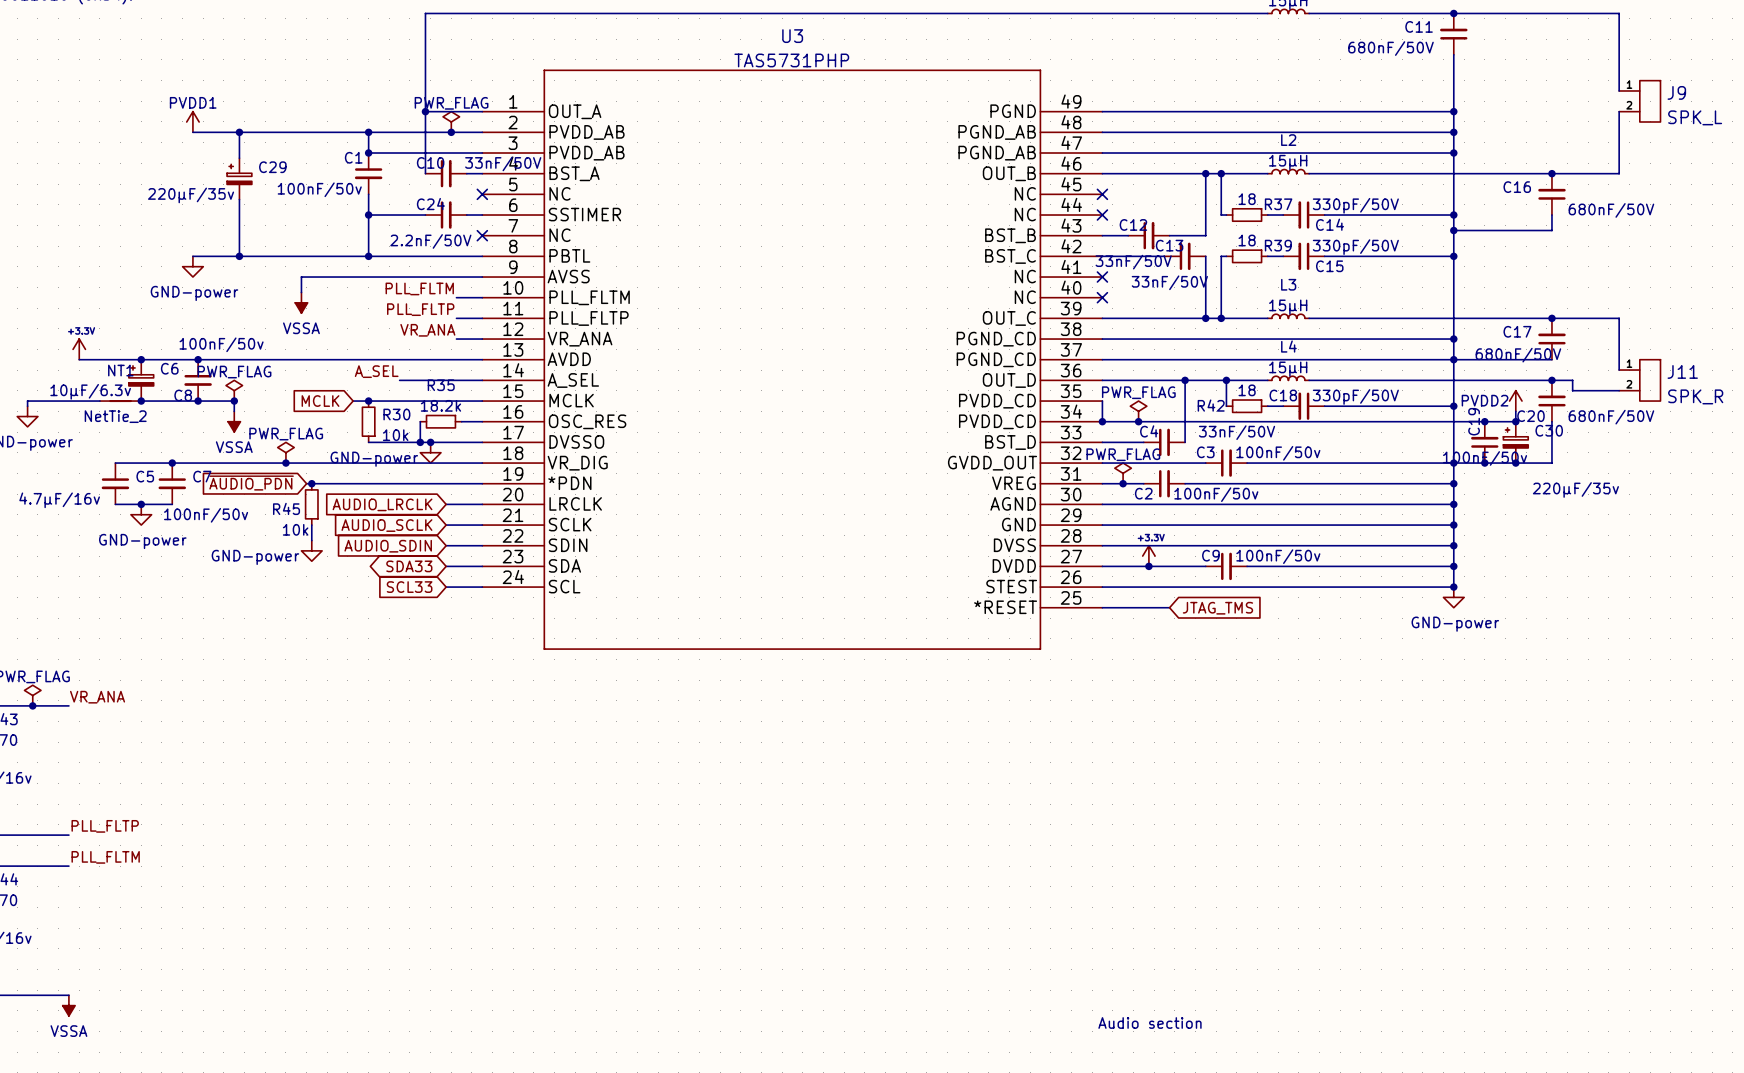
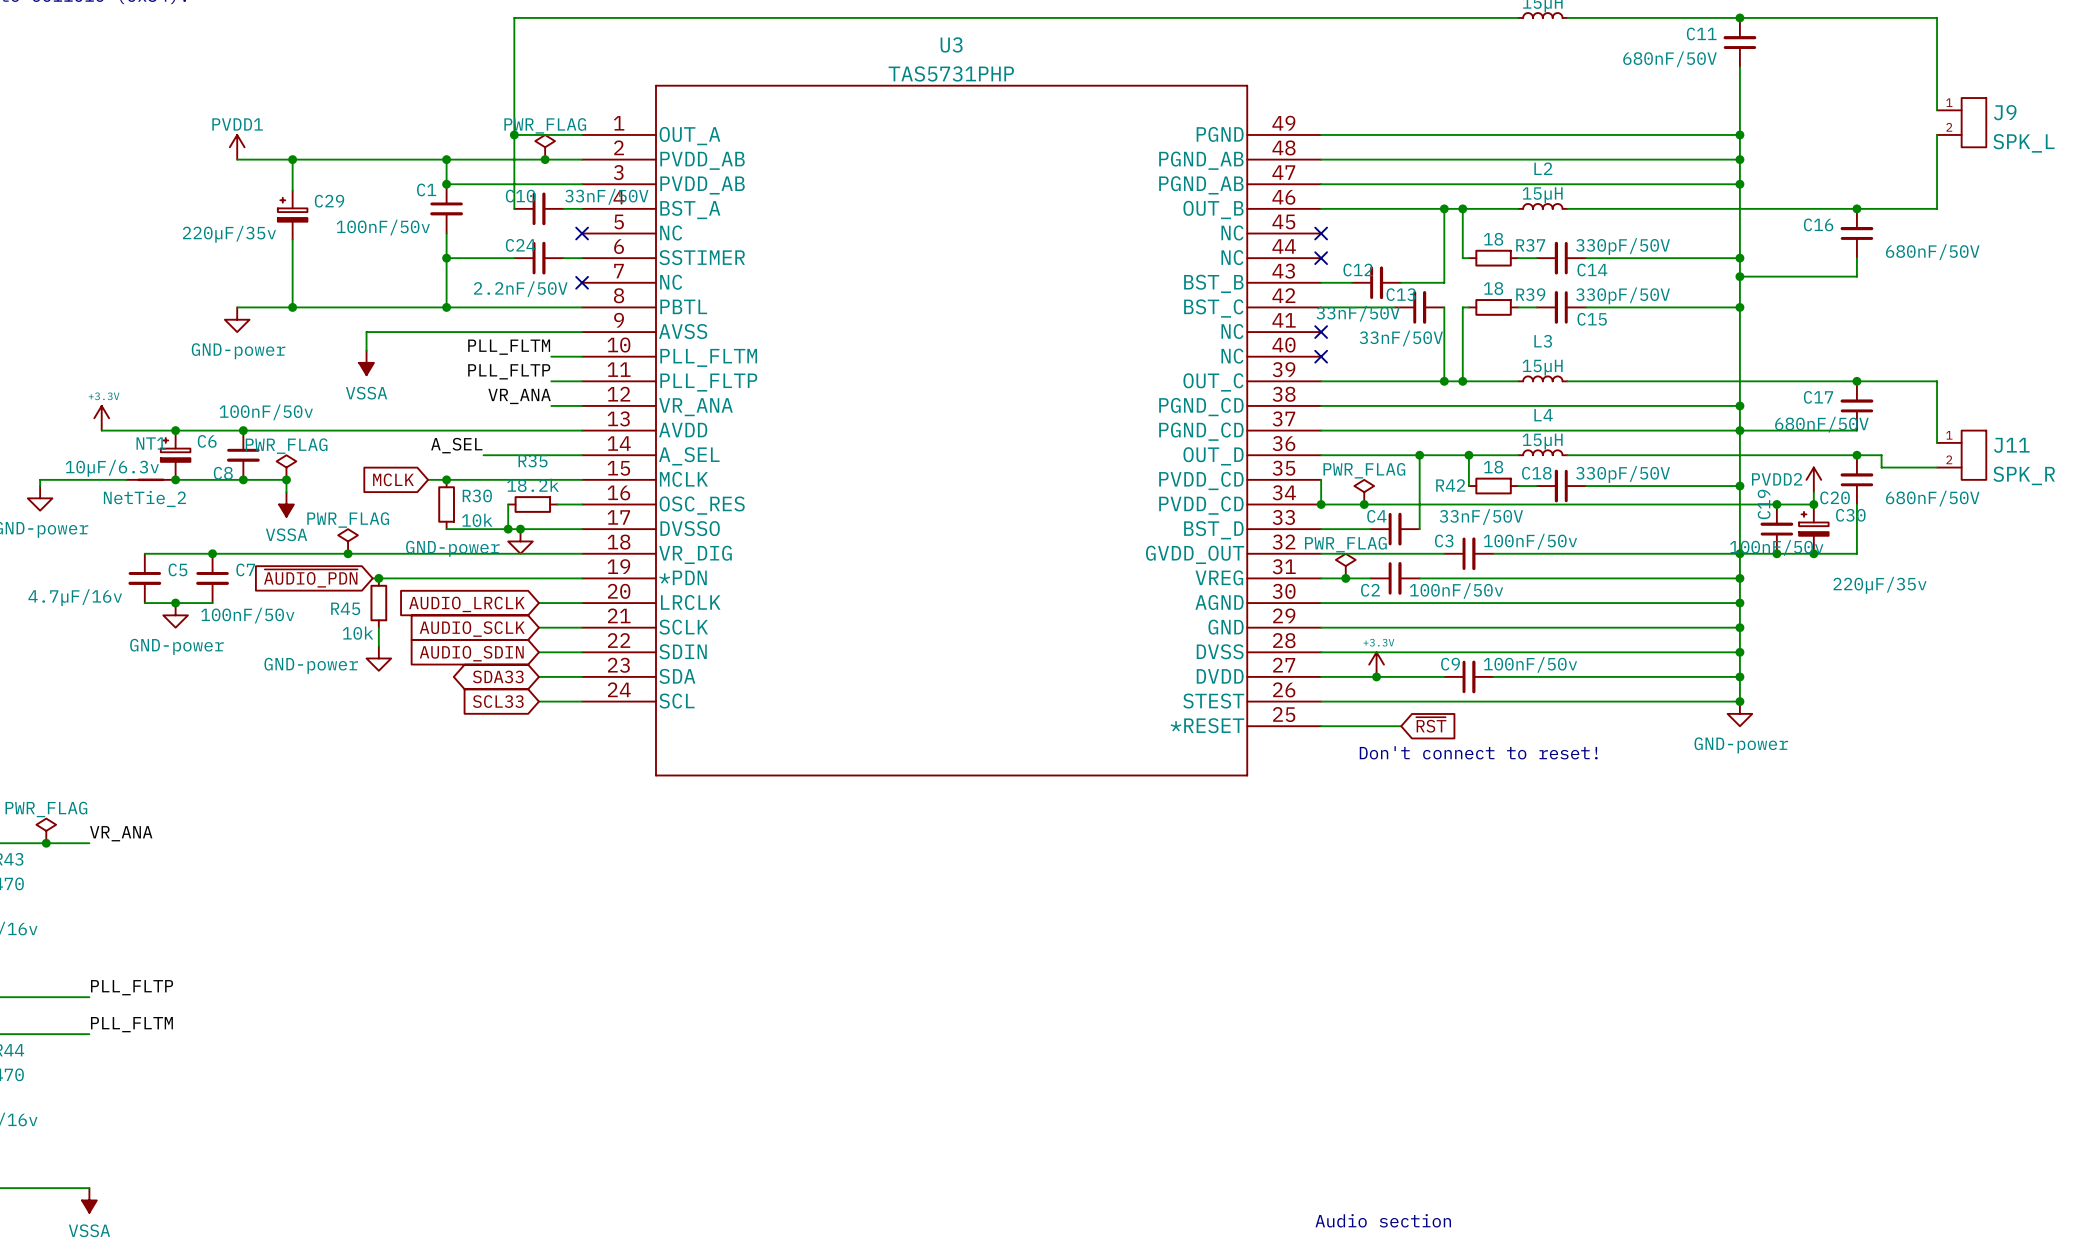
global label: JTAG_TMS (1217, 608) -> ~{RST} (1431, 724)
text: none -> Don't connect to reset! (1478, 752)

